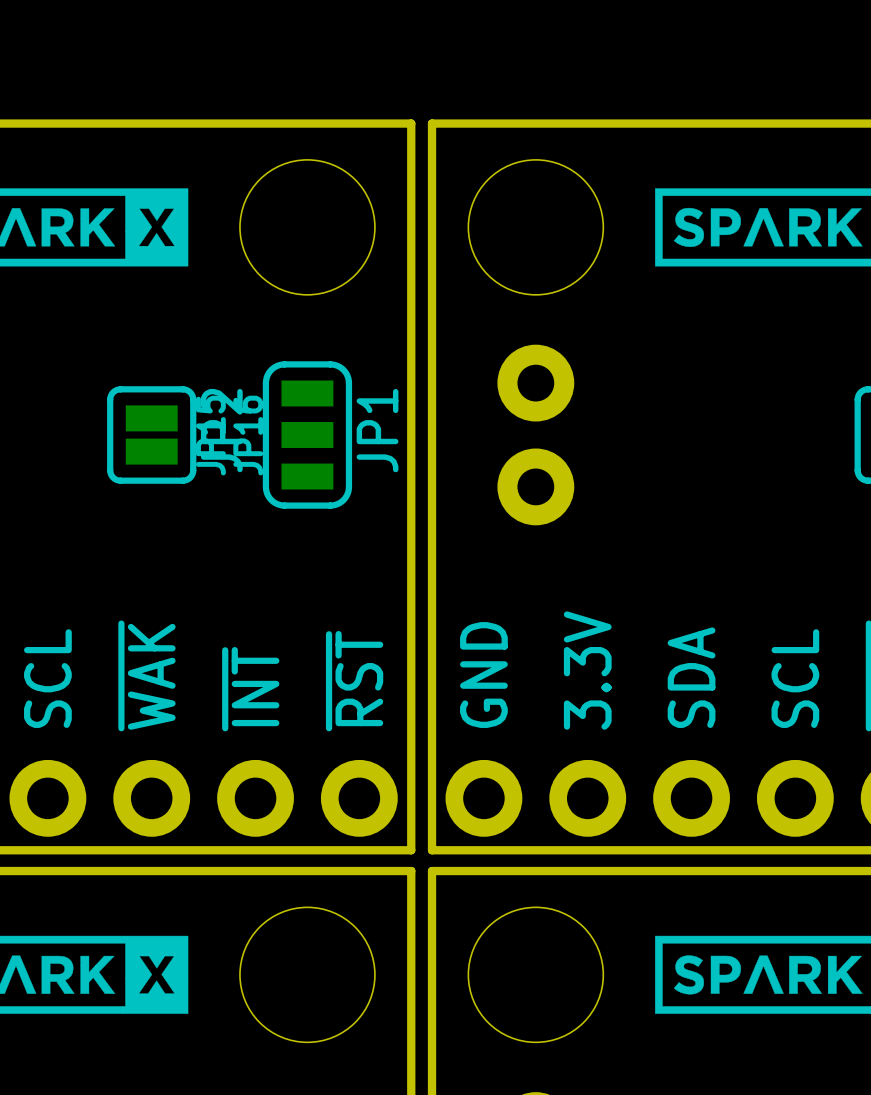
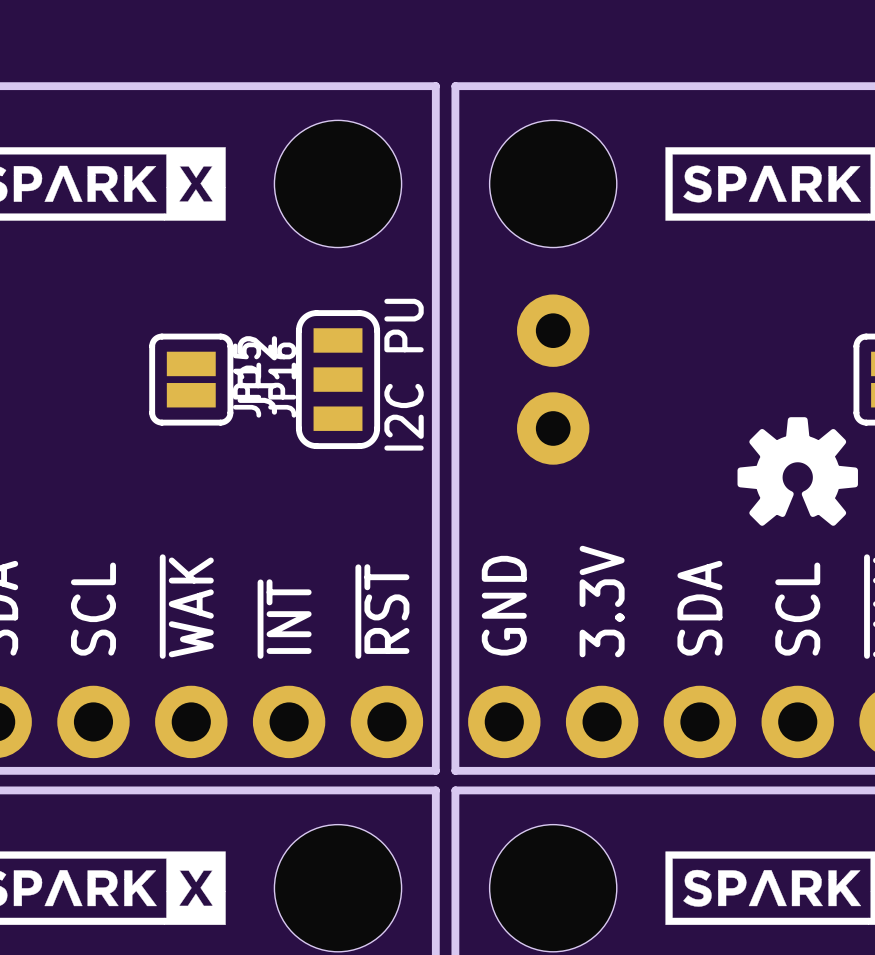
text: JP1 (377, 430) -> I2C PU (404, 374)
drawing: none -> [737, 417, 858, 526]

